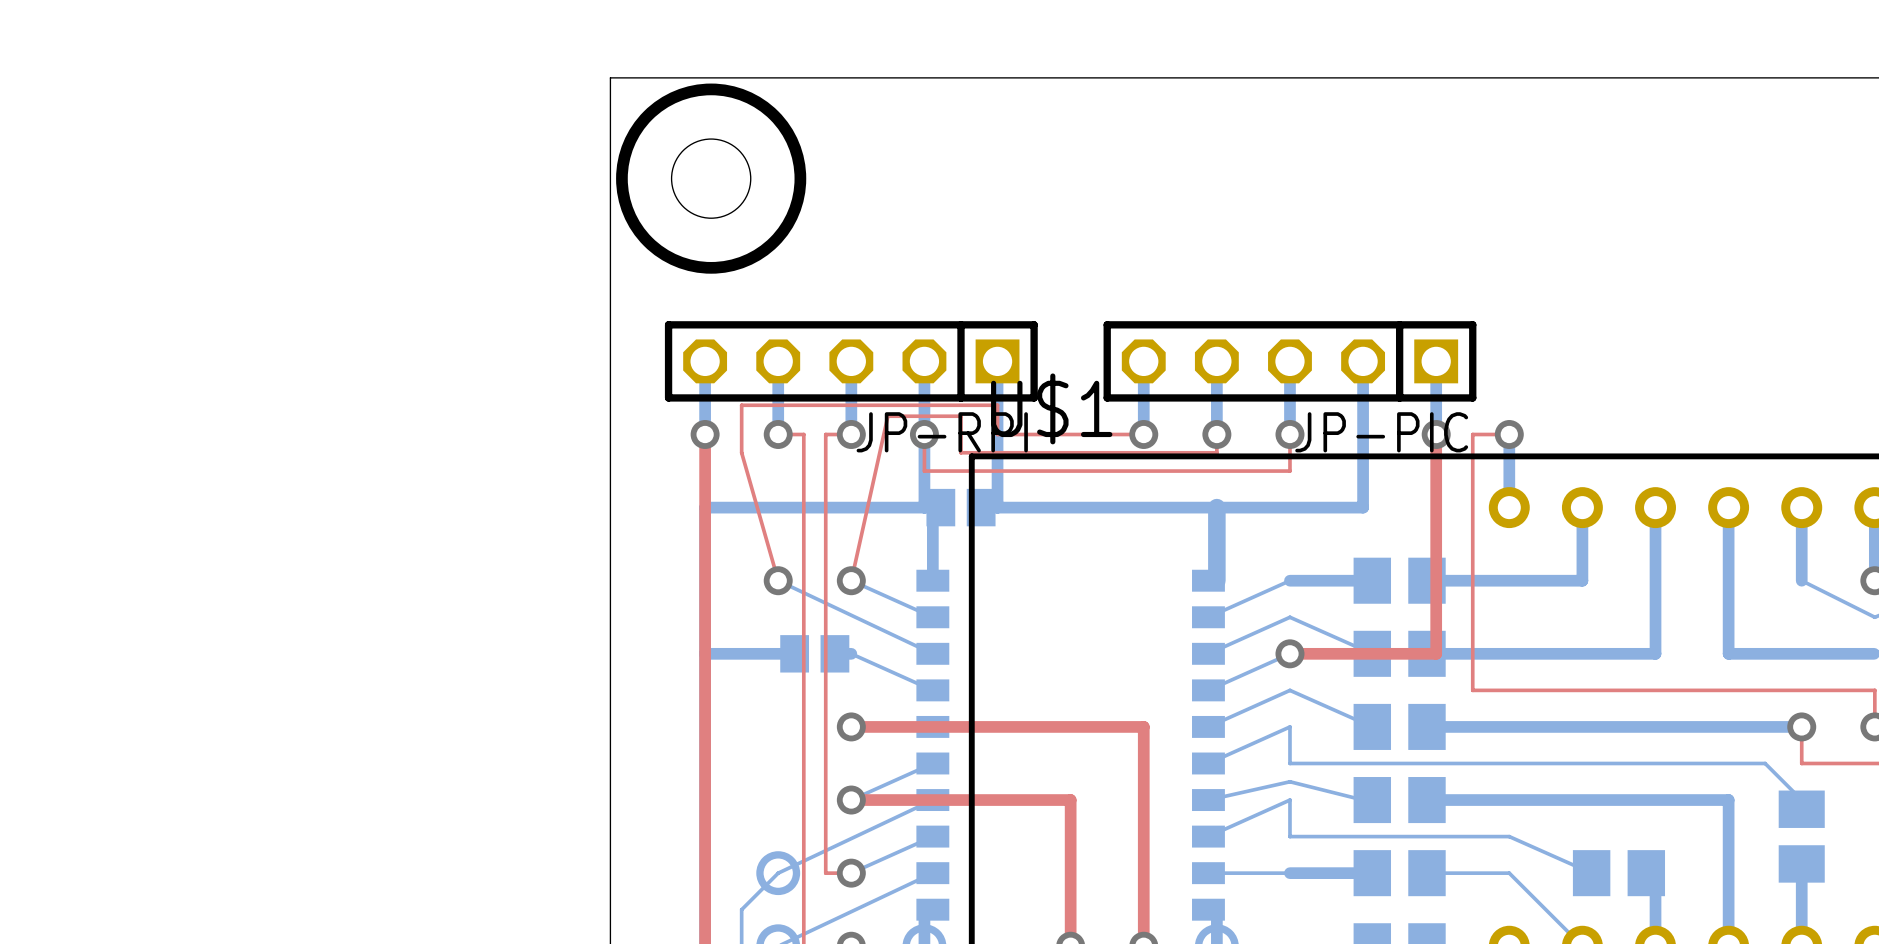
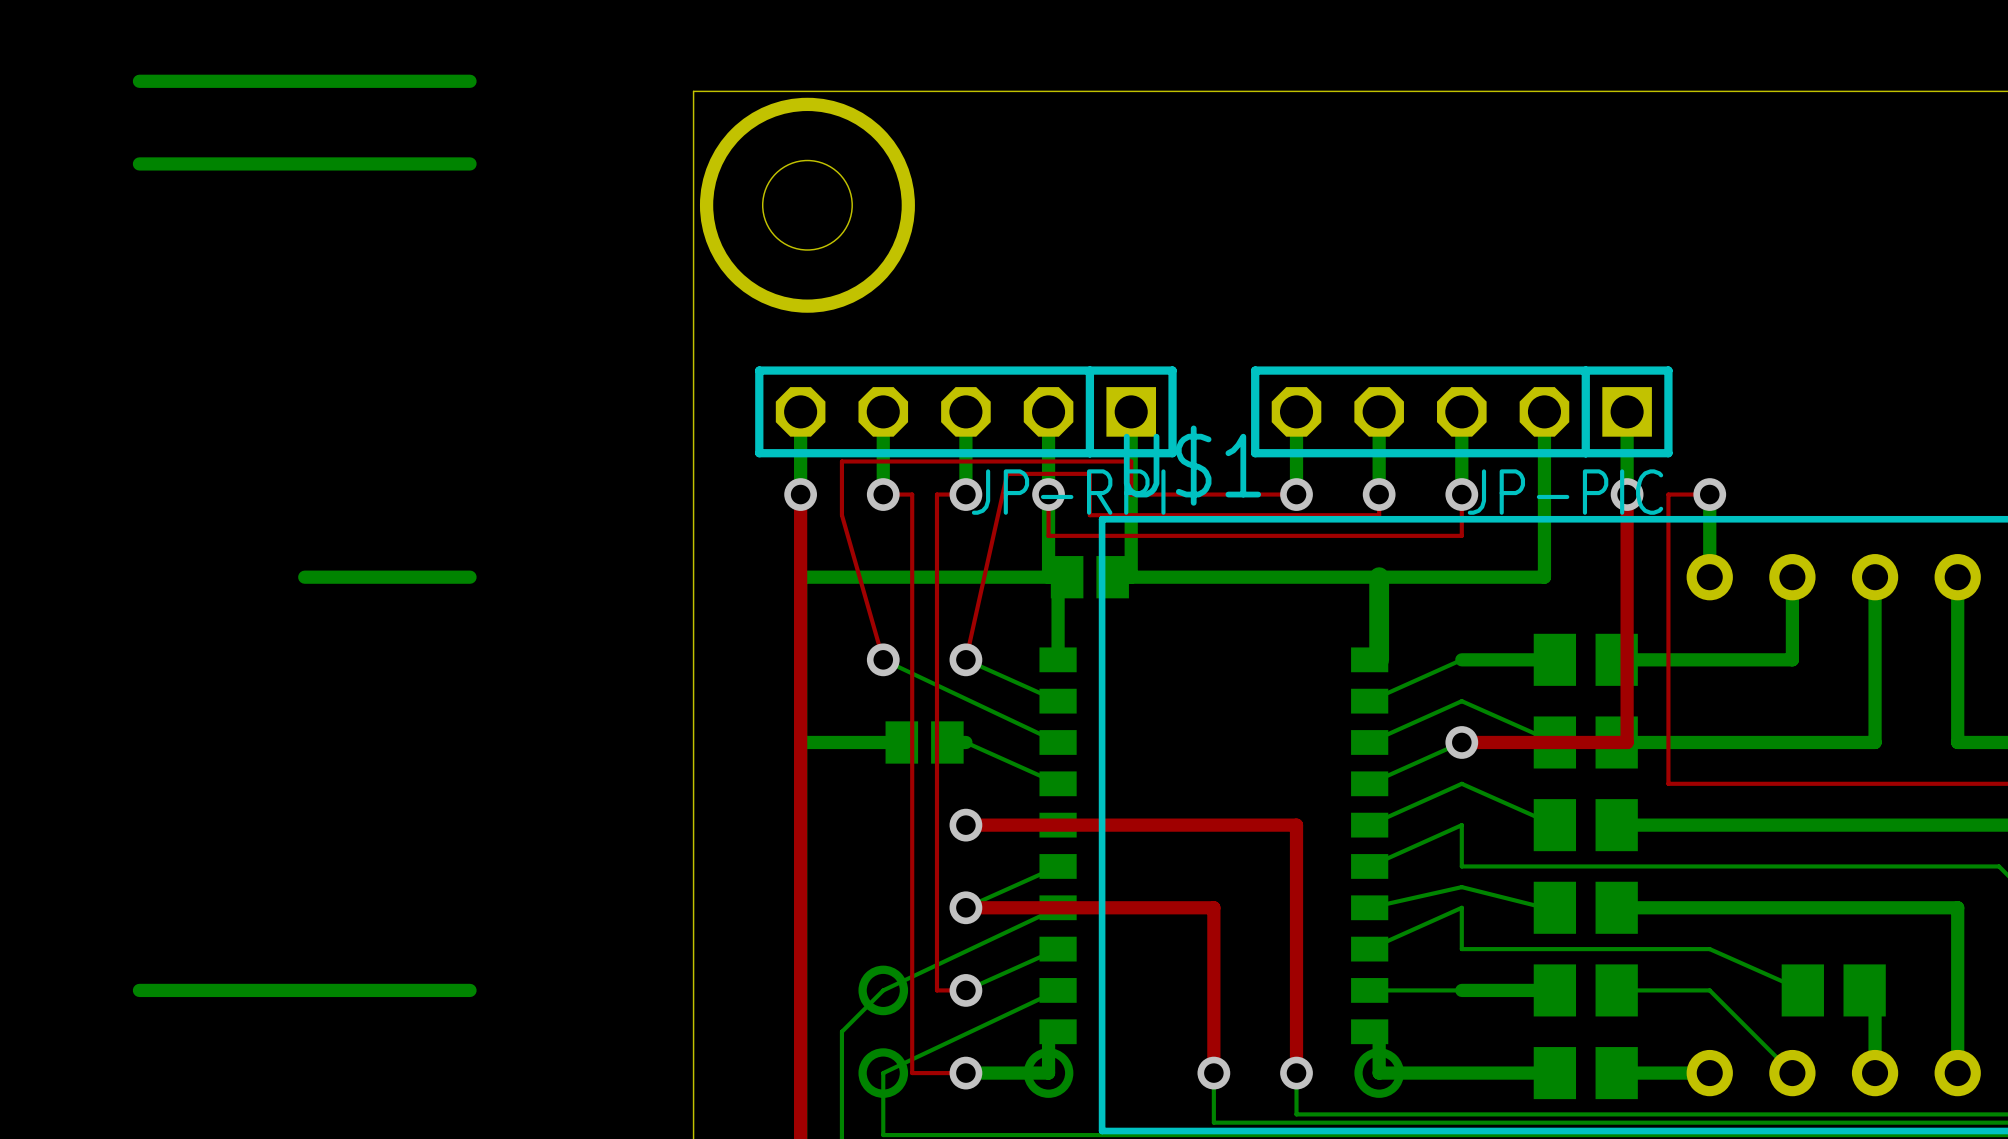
bottom track: none -> (139, 81) (470, 81)
bottom track: none -> (139, 163) (470, 163)
bottom track: none -> (304, 577) (470, 577)
bottom track: none -> (139, 990) (470, 990)

